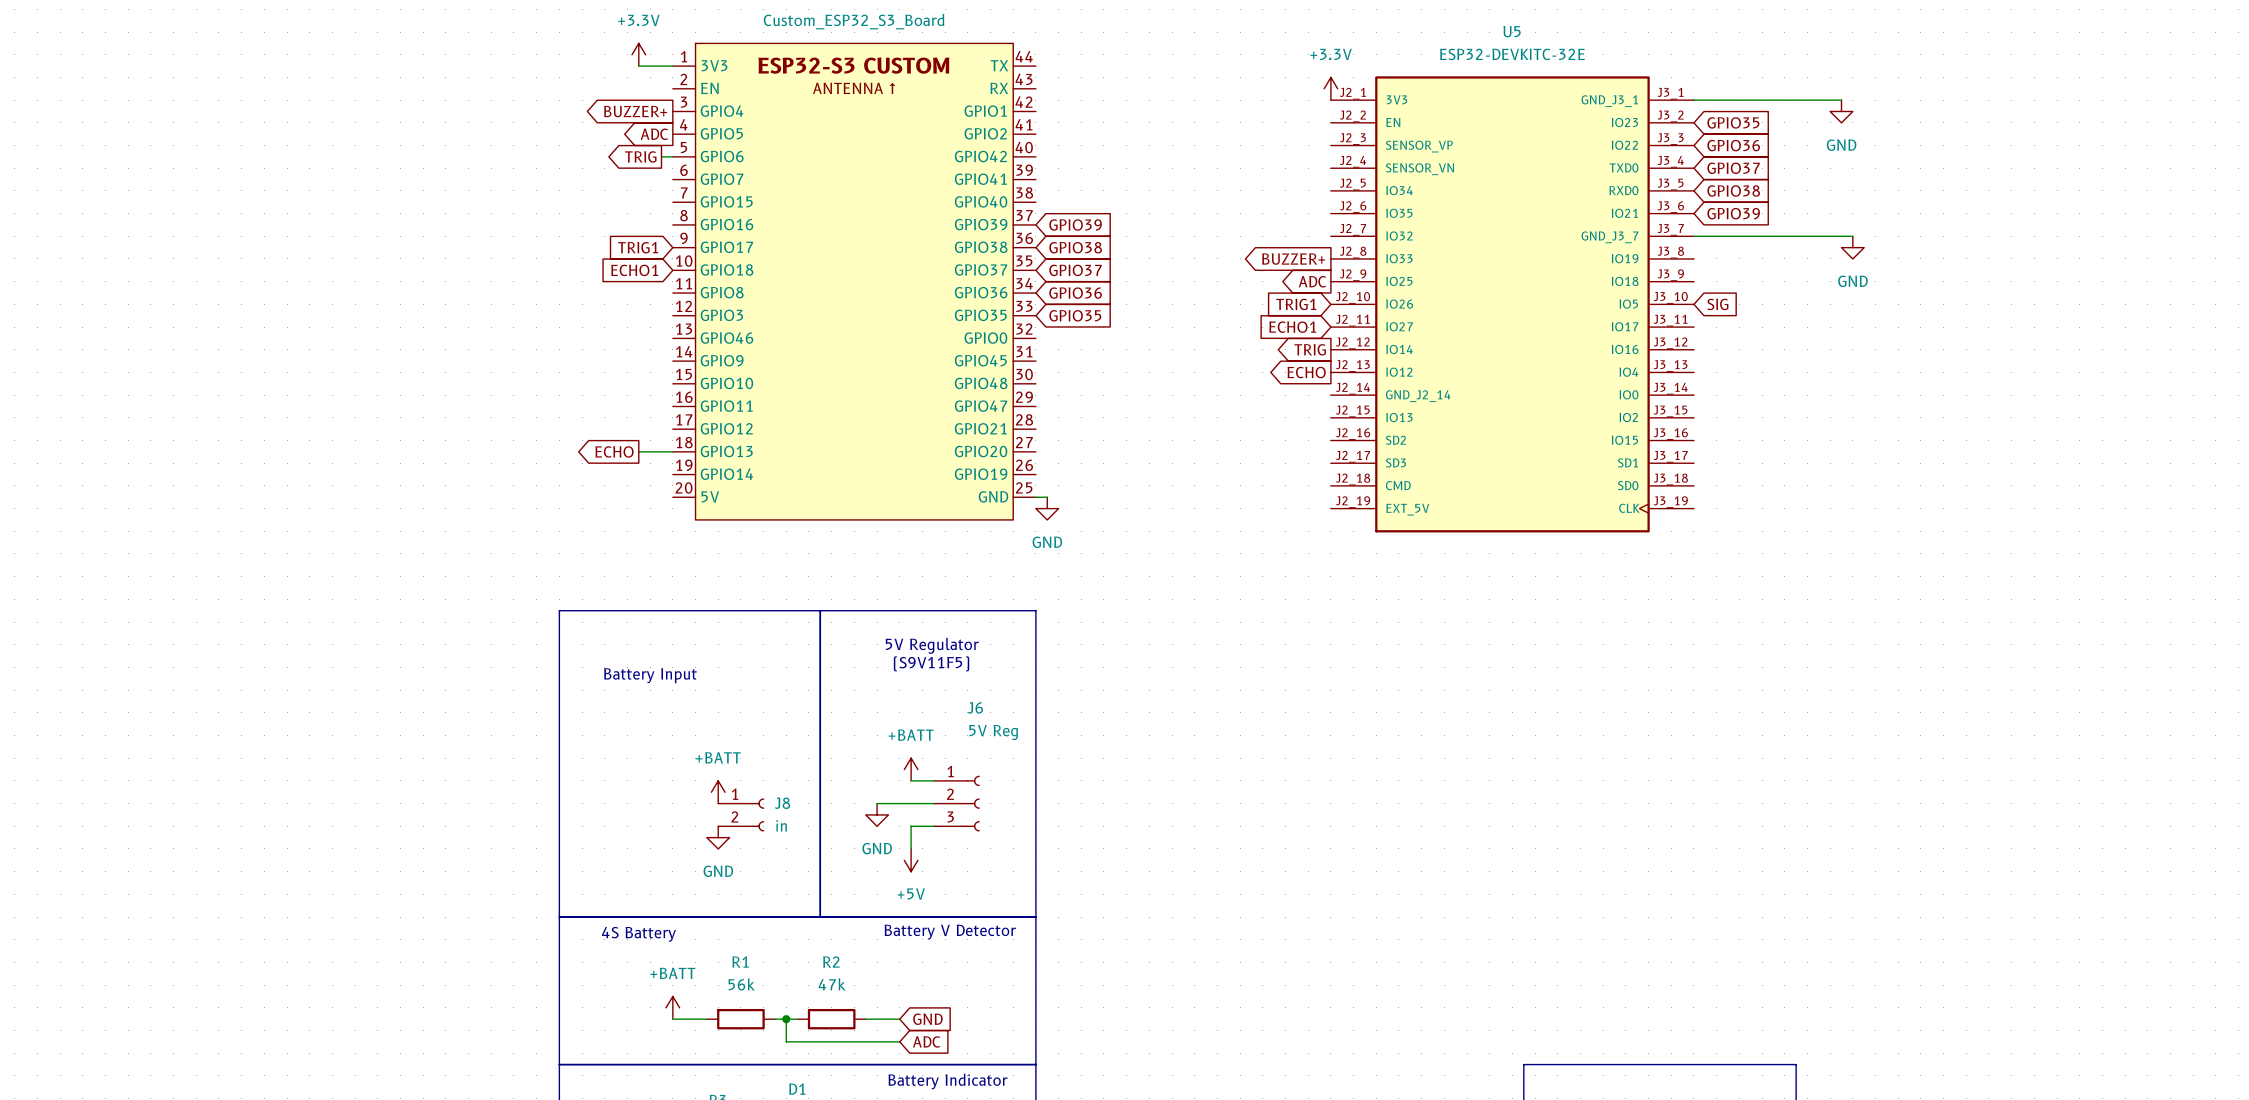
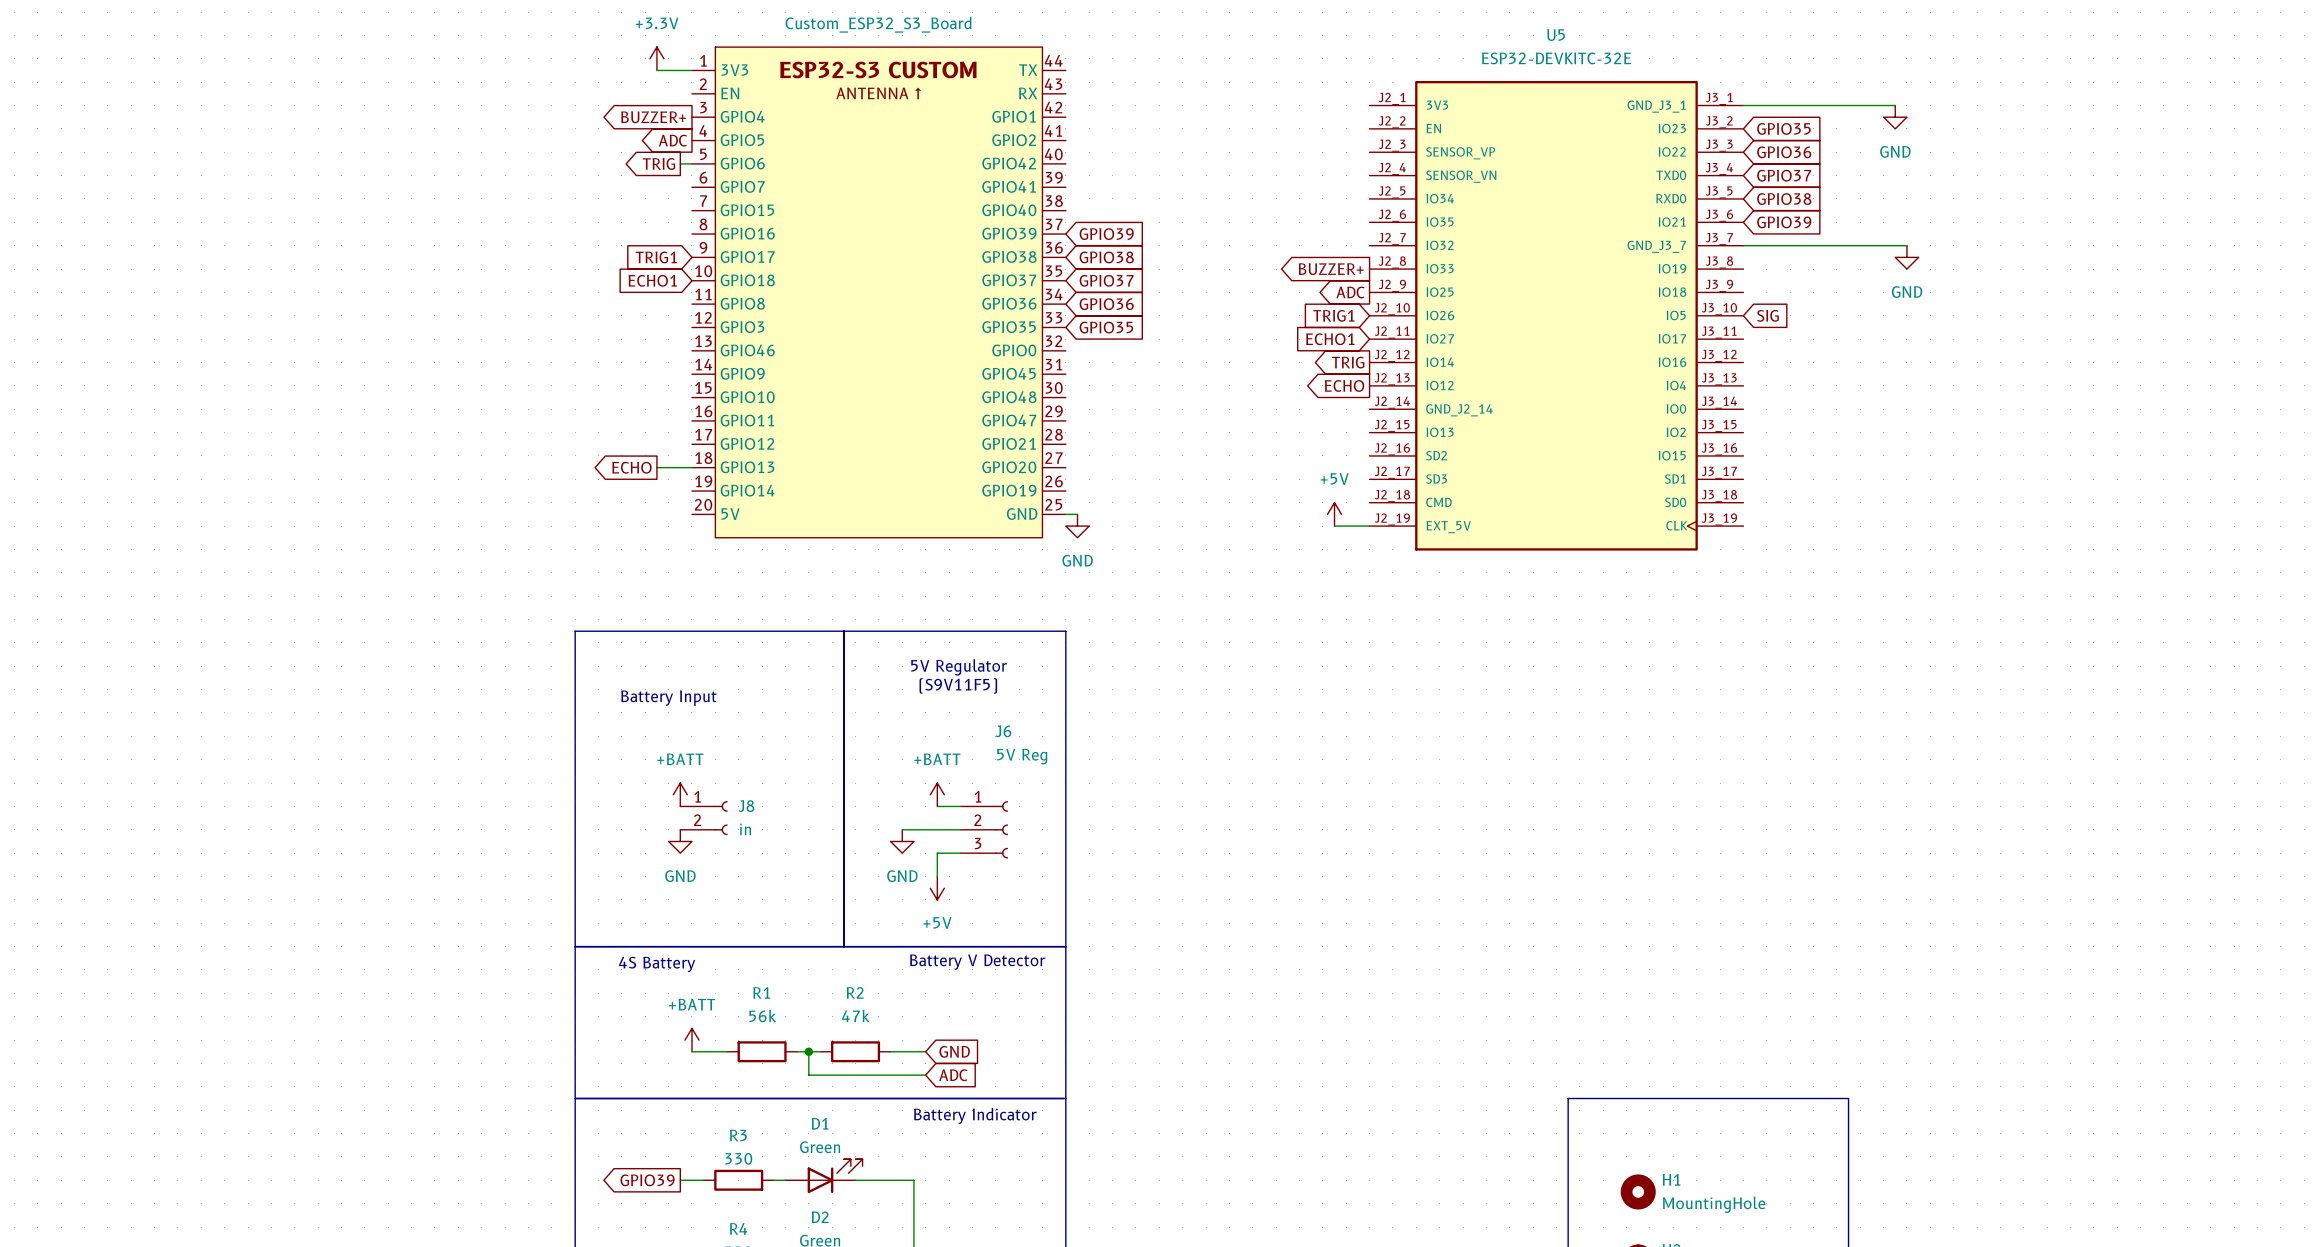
power symbol: +3.3V (1330, 88) -> none
power symbol: none -> +5V (1334, 514)
wire: none -> (1334, 526) (1369, 526)
power symbol position: +BATT (718, 792) -> +BATT (680, 794)
J8 position: (741, 814) -> (704, 818)
power symbol position: GND (718, 837) -> GND (680, 841)

